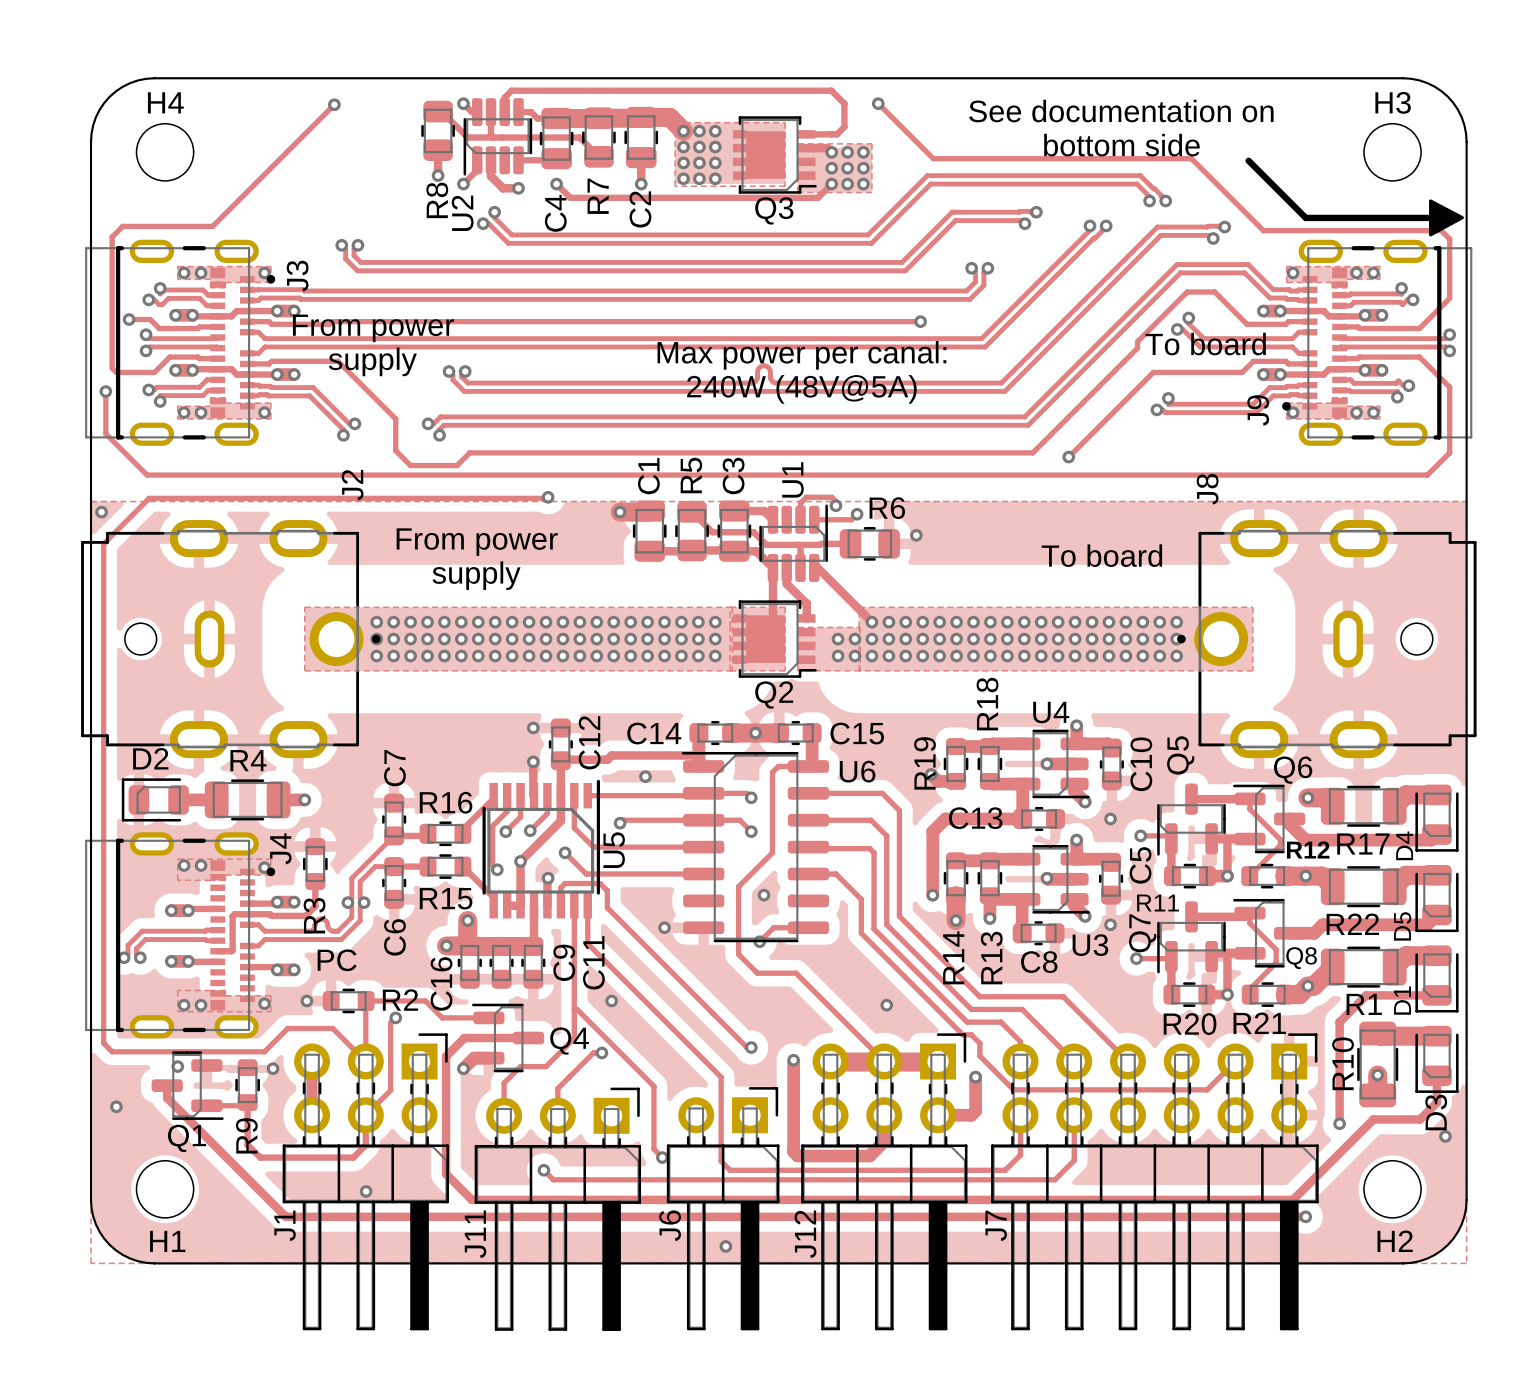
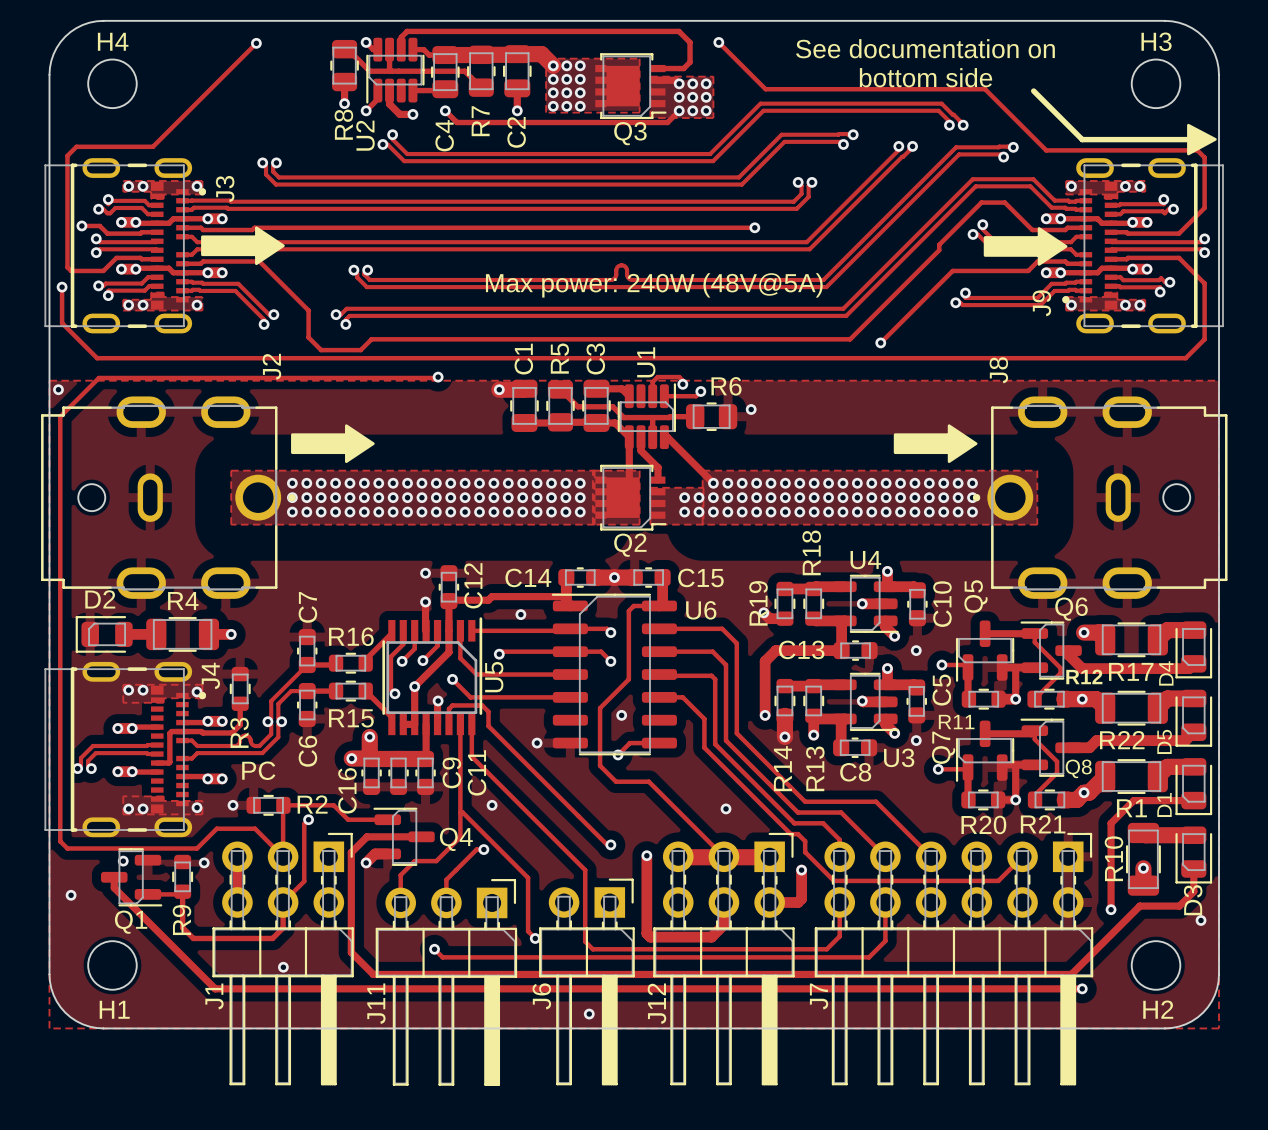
drawing: none -> [201, 226, 285, 266]
drawing: none -> [983, 227, 1068, 266]
text: From power (373, 328) -> none
text: To board (1205, 344) -> none
text: Max power per canal: (801, 355) -> none
text: supply (372, 361) -> none
text: 240W (48V@5A) (801, 389) -> Max power: 240W (48V@5A) (654, 285)
text: From power (477, 542) -> none
drawing: none -> [291, 424, 375, 464]
drawing: none -> [893, 424, 978, 464]
text: To board (1101, 555) -> none
text: supply (476, 575) -> none

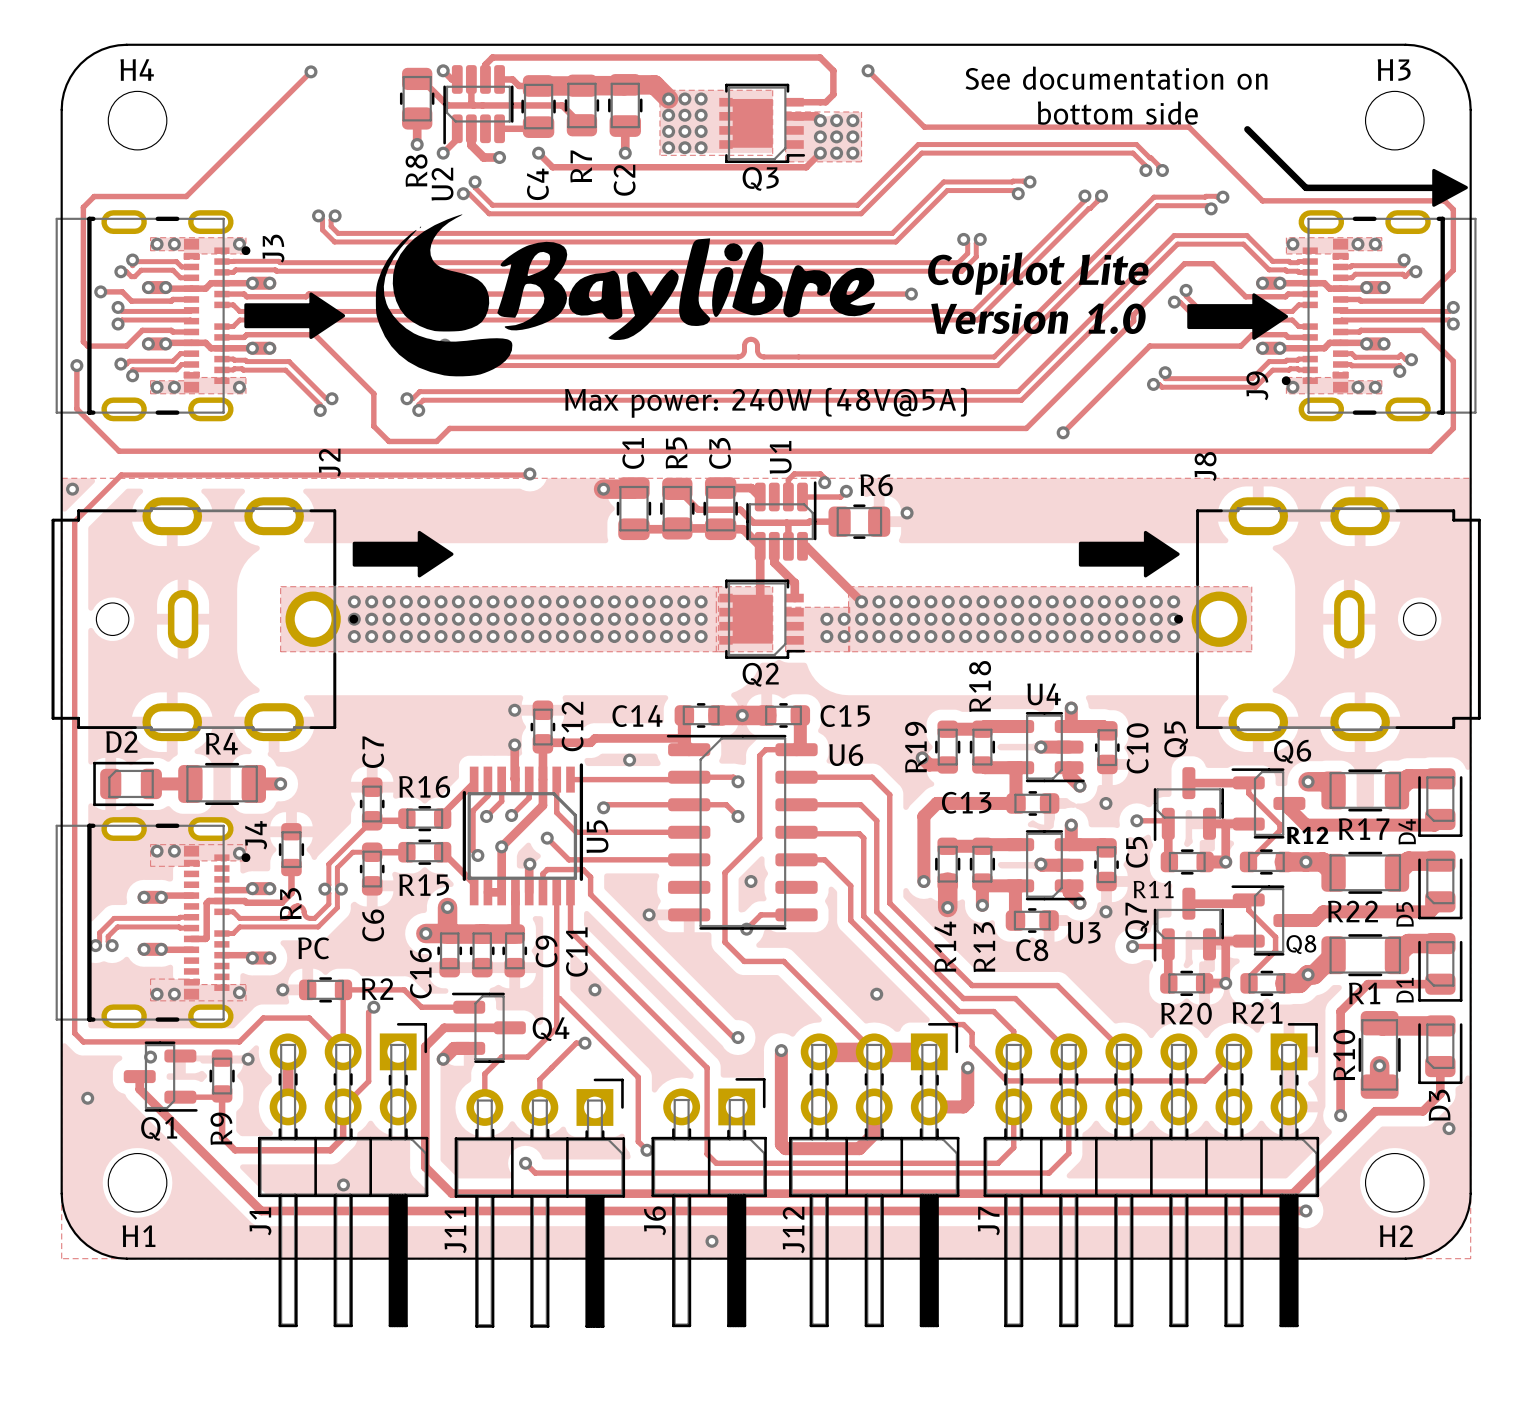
drawing: none -> [375, 214, 875, 377]
text: none -> Copilot Lite (1038, 273)
text: none -> Version 1.0 (1038, 318)
text position: Max power: 240W (48V@5A) (654, 285) -> Max power: 240W (48V@5A) (765, 402)

